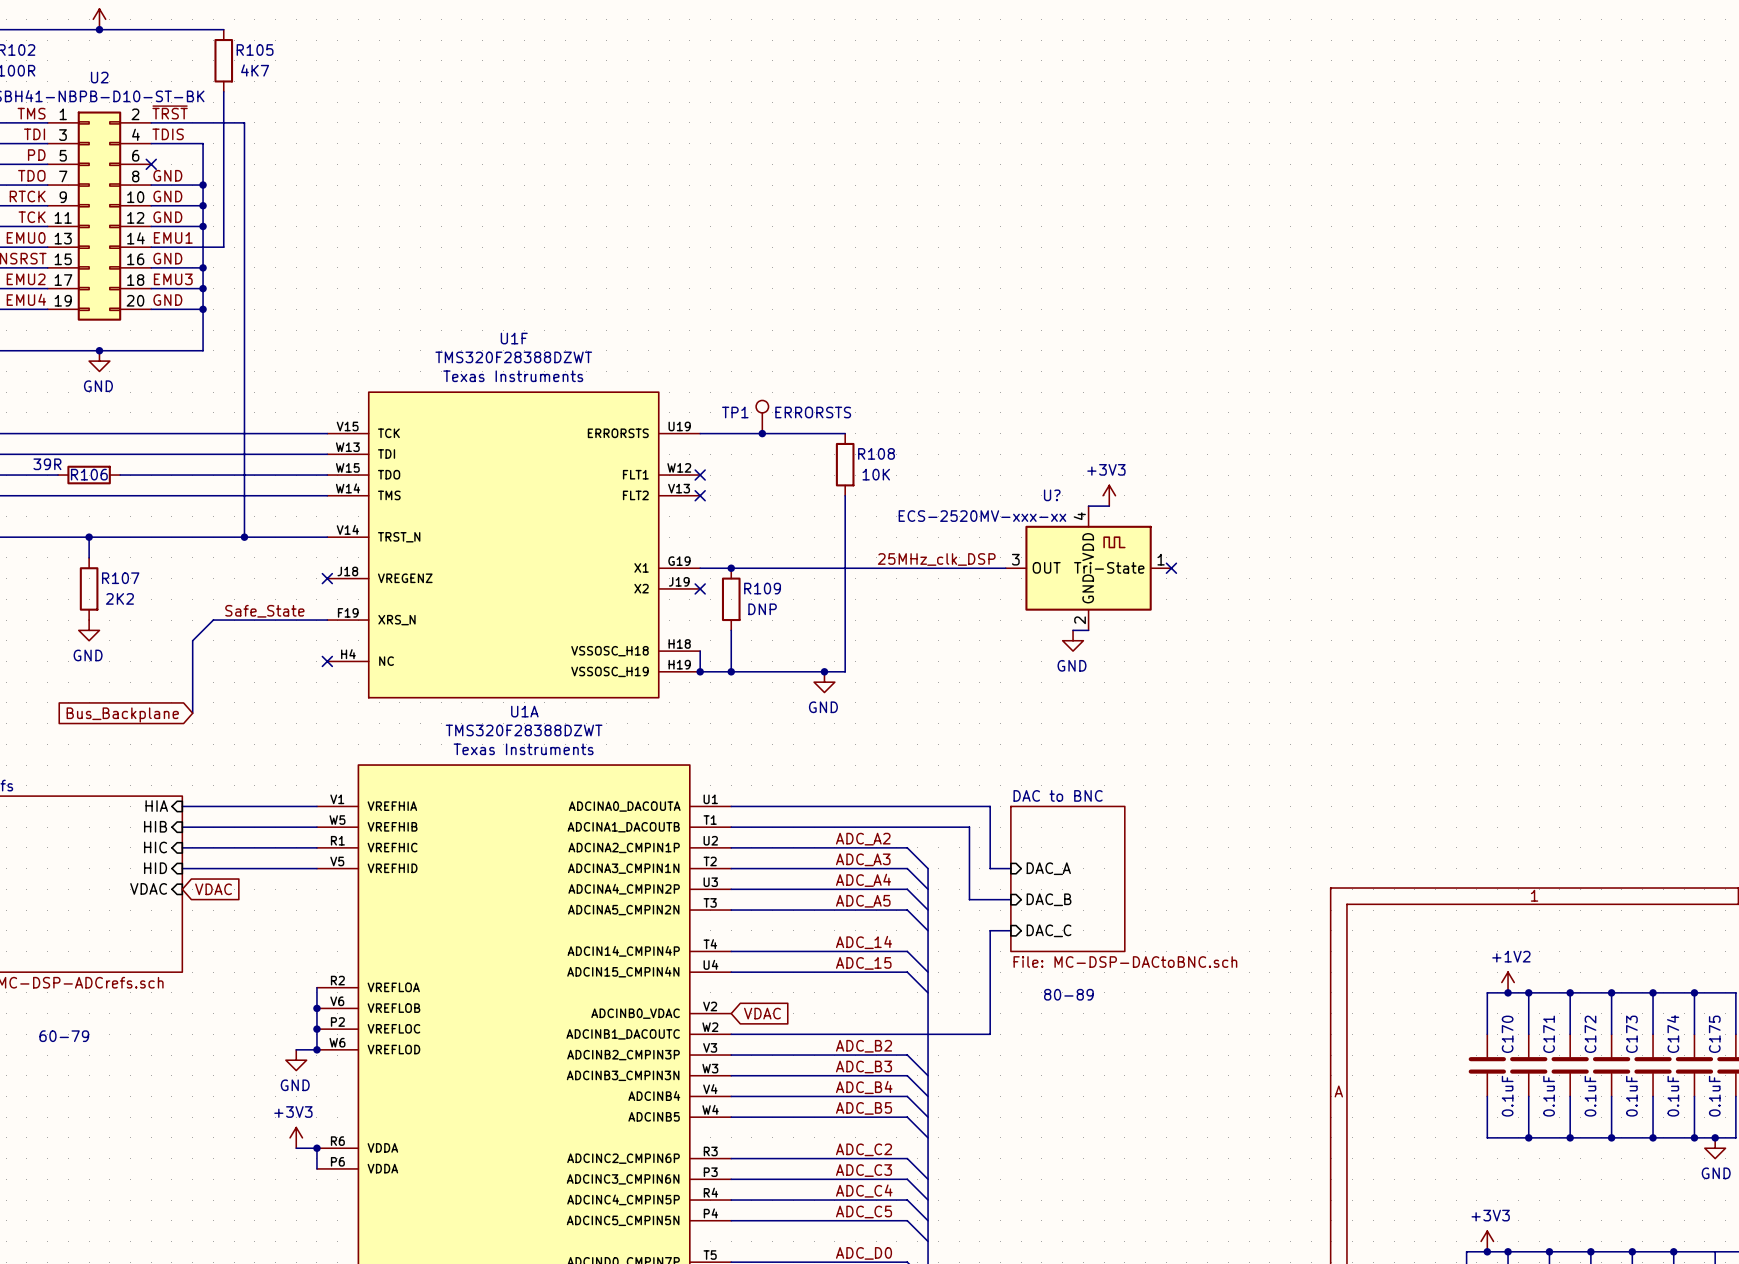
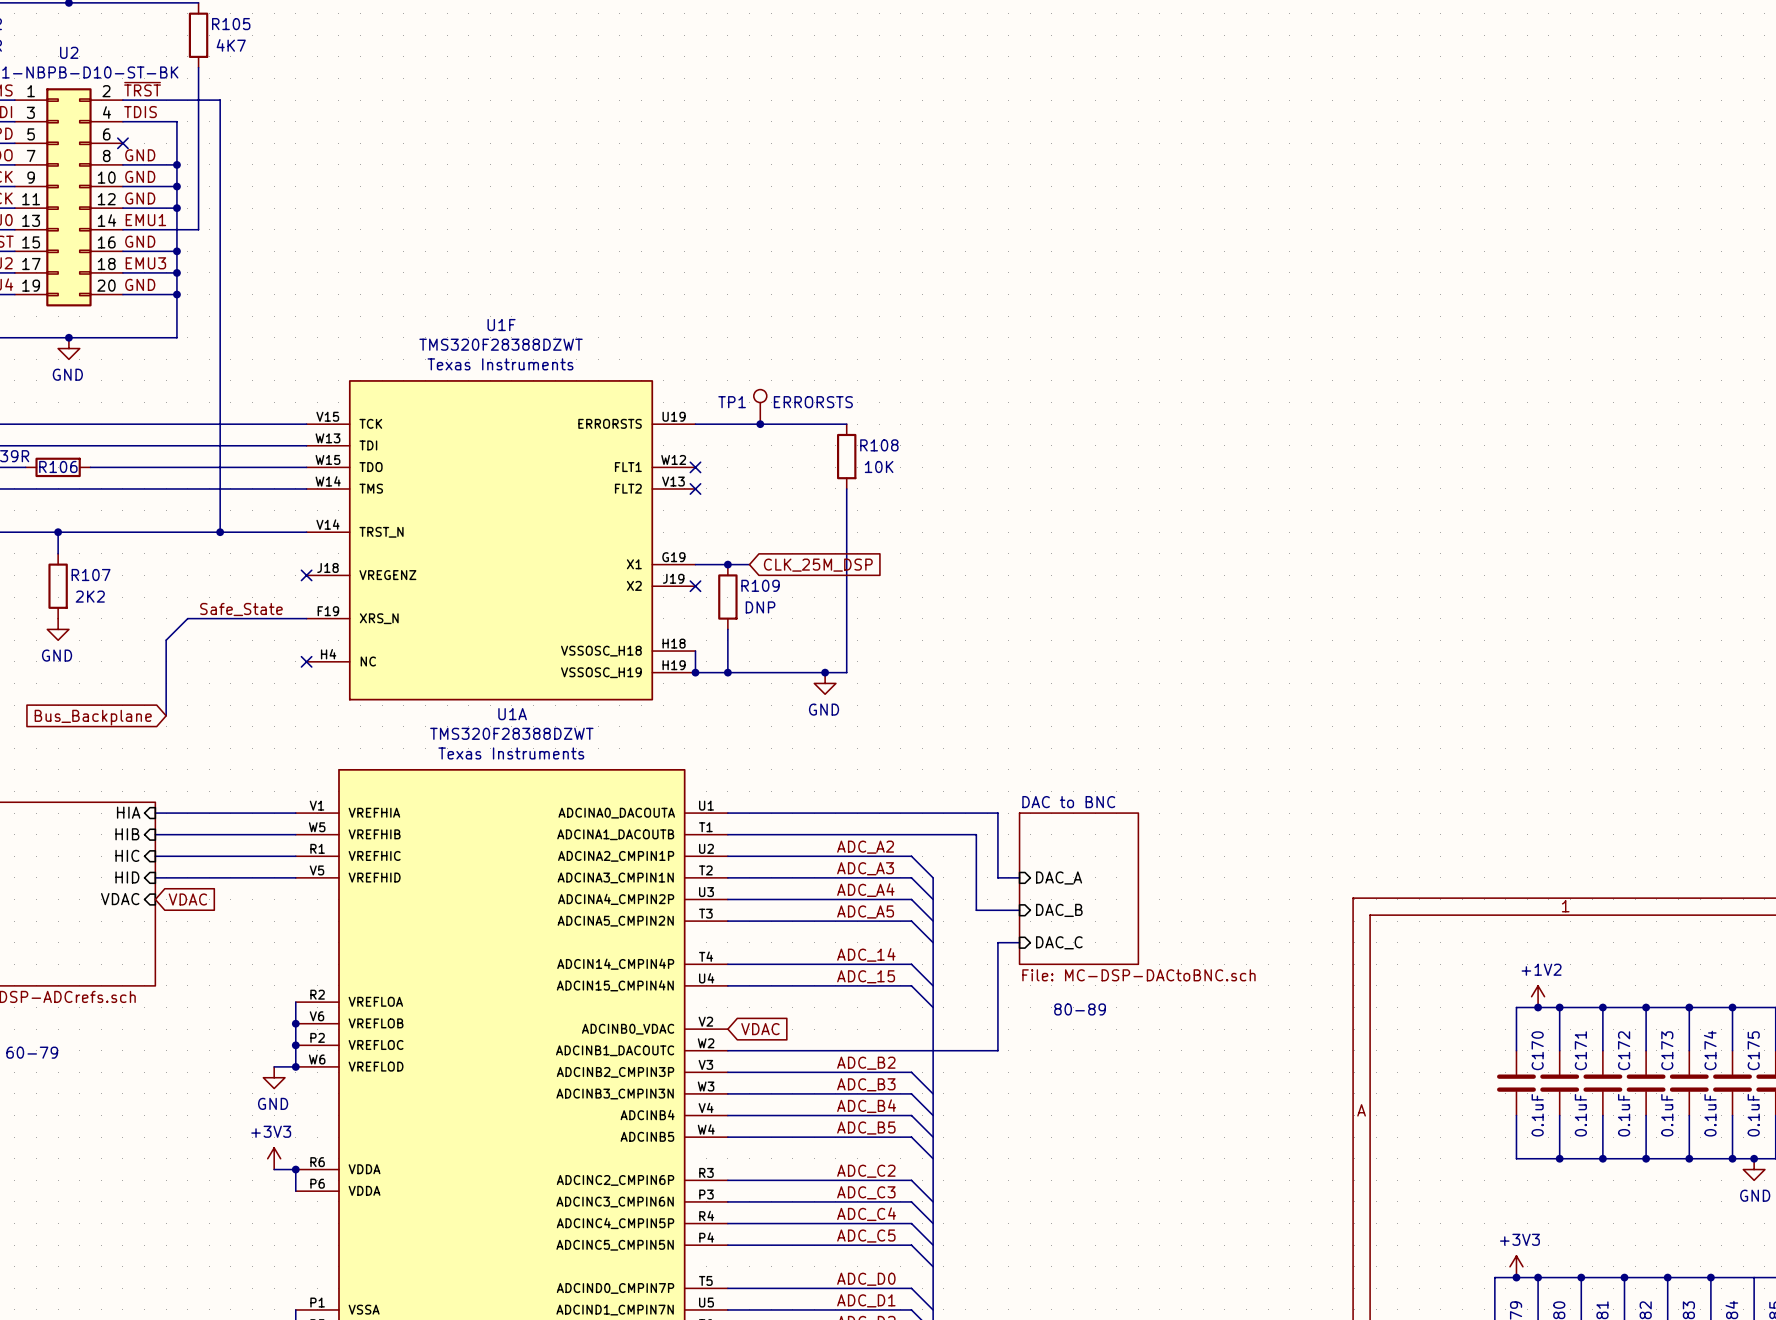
power symbol: +3V3 (1109, 495) -> none
wire: (1088, 506) (1109, 506) -> none
label: 25MHz_clk_DSP (936, 559) -> none
wire: (751, 568) (1005, 568) -> none
global label: none -> CLK_25M_DSP (818, 565)
U?: ECS-2520MV-xxx-xx (1088, 568) -> none
no-connect mark: (1171, 568) -> none
wire: (1073, 630) (1088, 630) -> none
power symbol: GND (1073, 640) -> none

